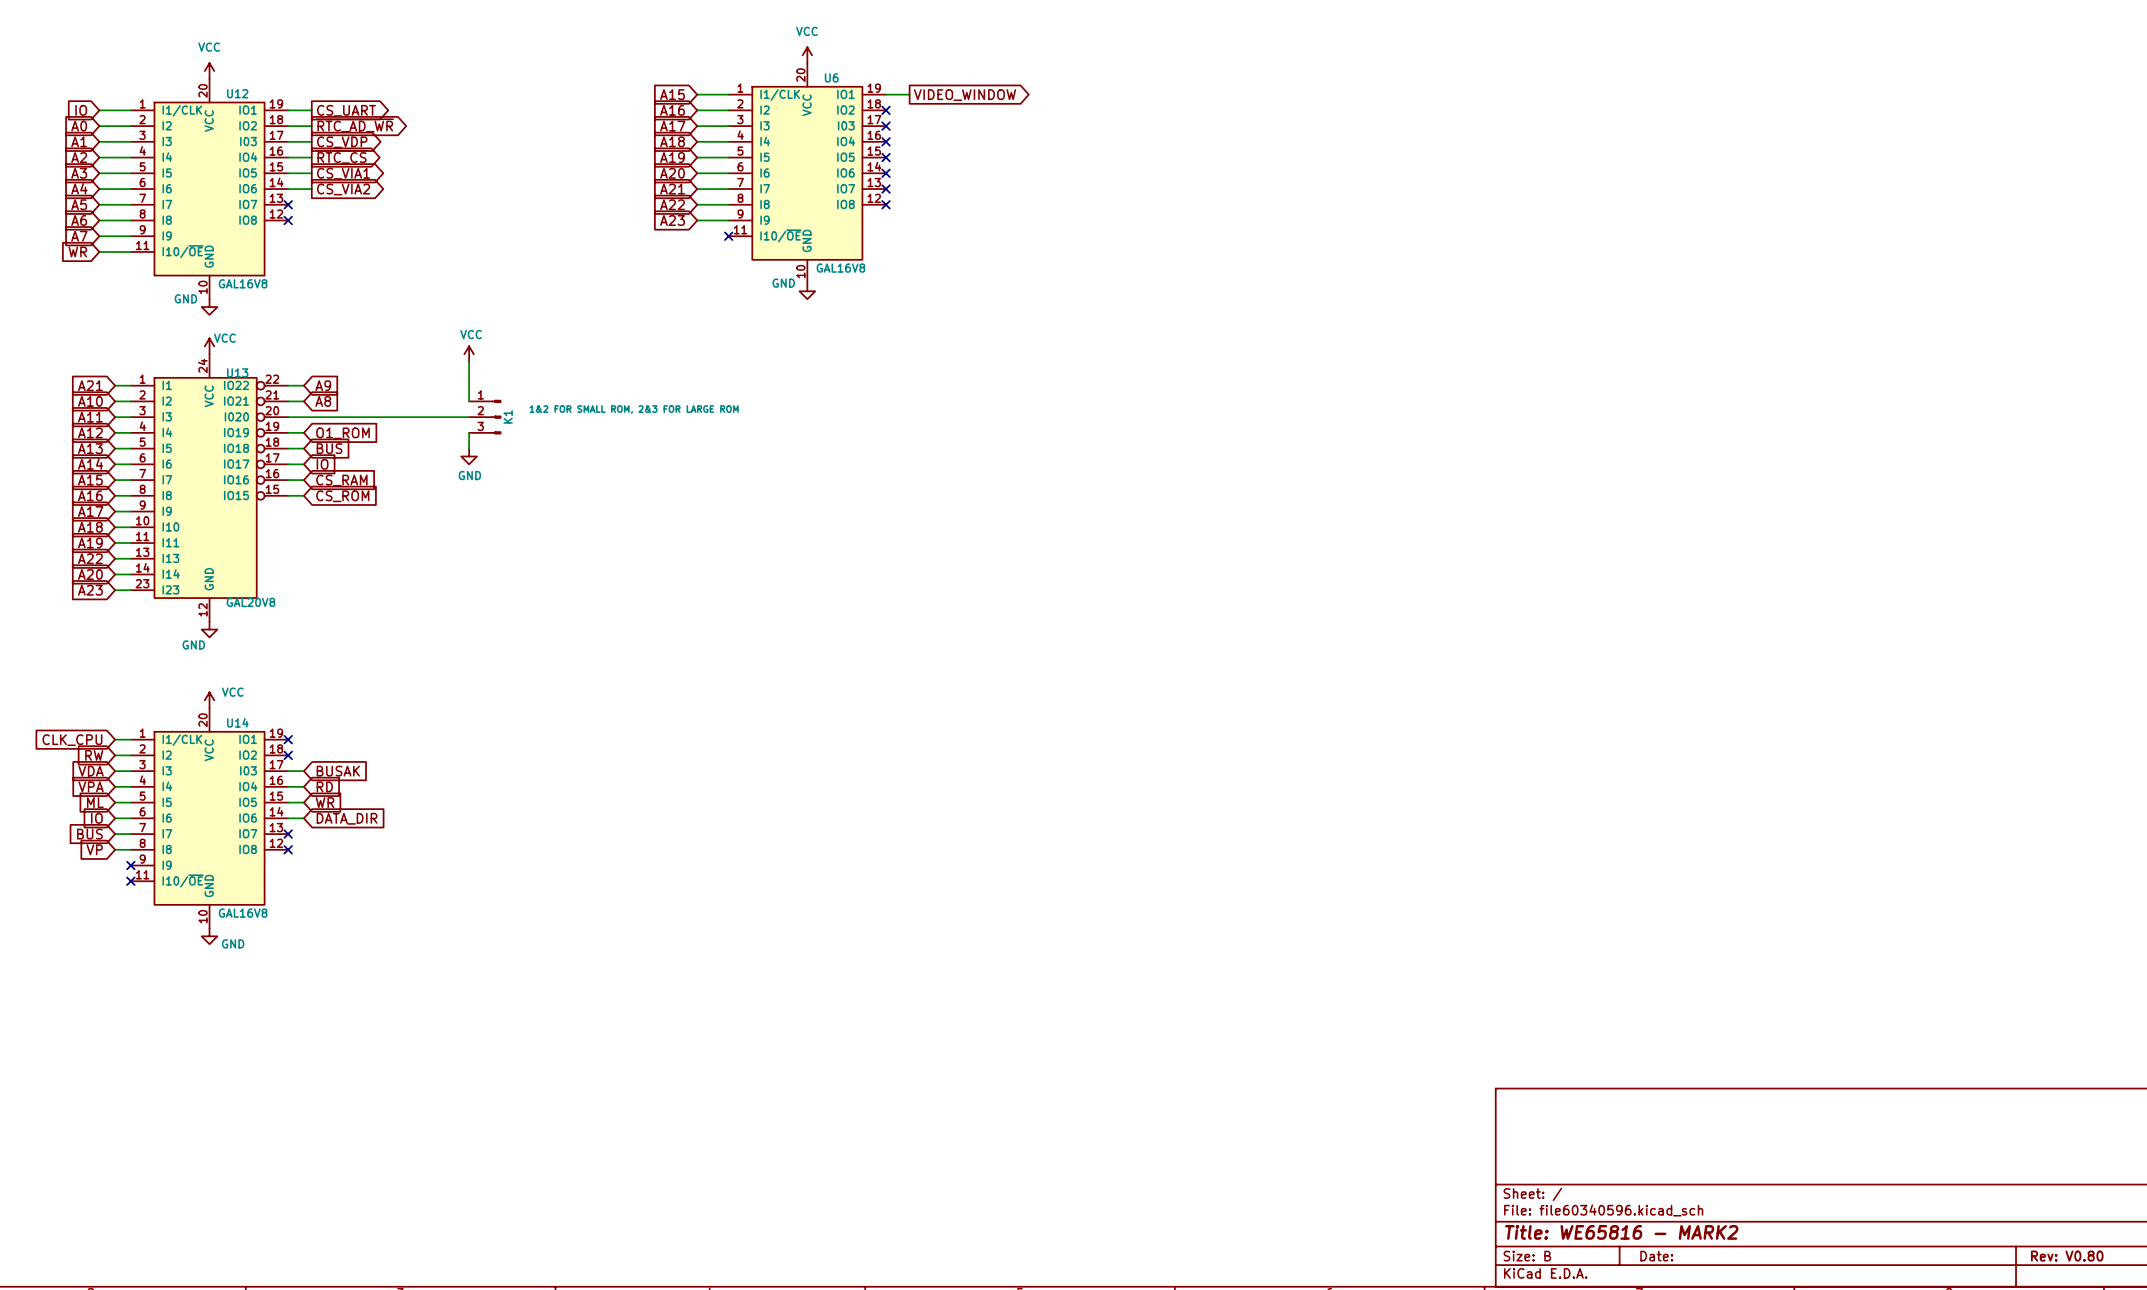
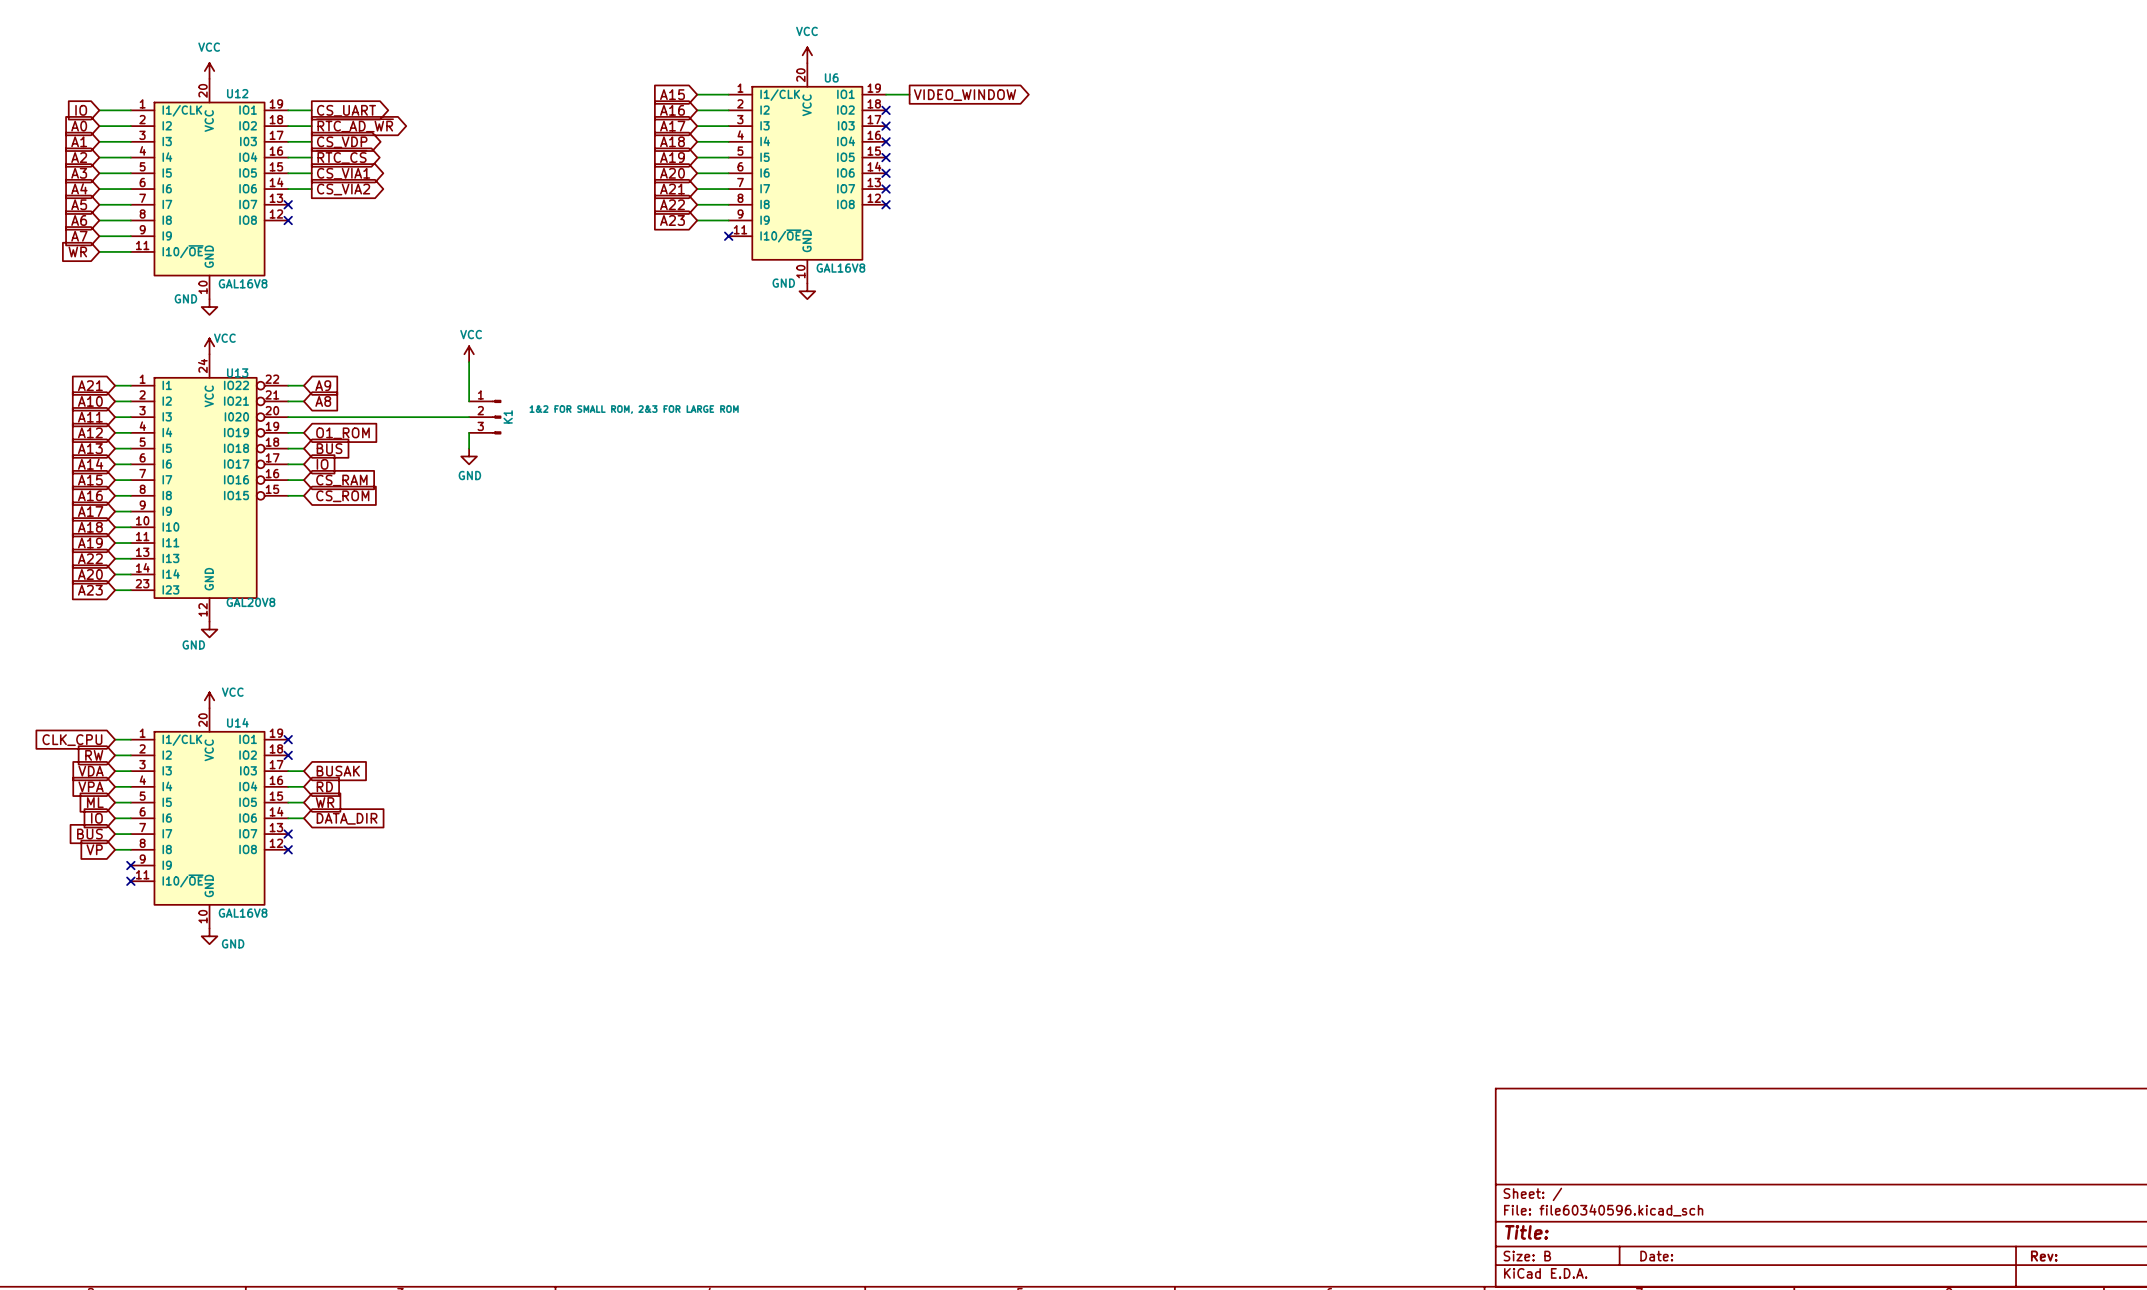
title block: Title: WE65816 - MARK2 (1621, 1232) -> Title: (1526, 1232)
title block: Rev: V0.80 (2067, 1256) -> Rev: (2044, 1256)

